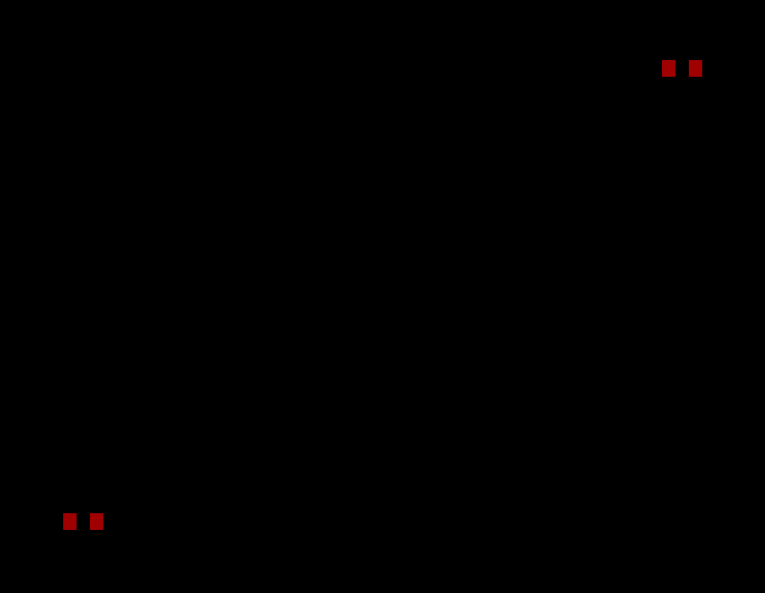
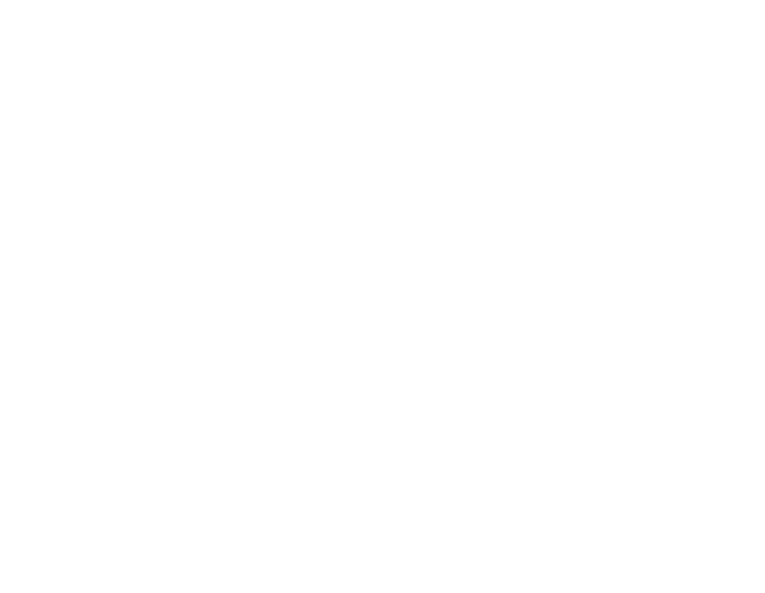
part: (682, 68) -> none
part: (83, 521) -> none

